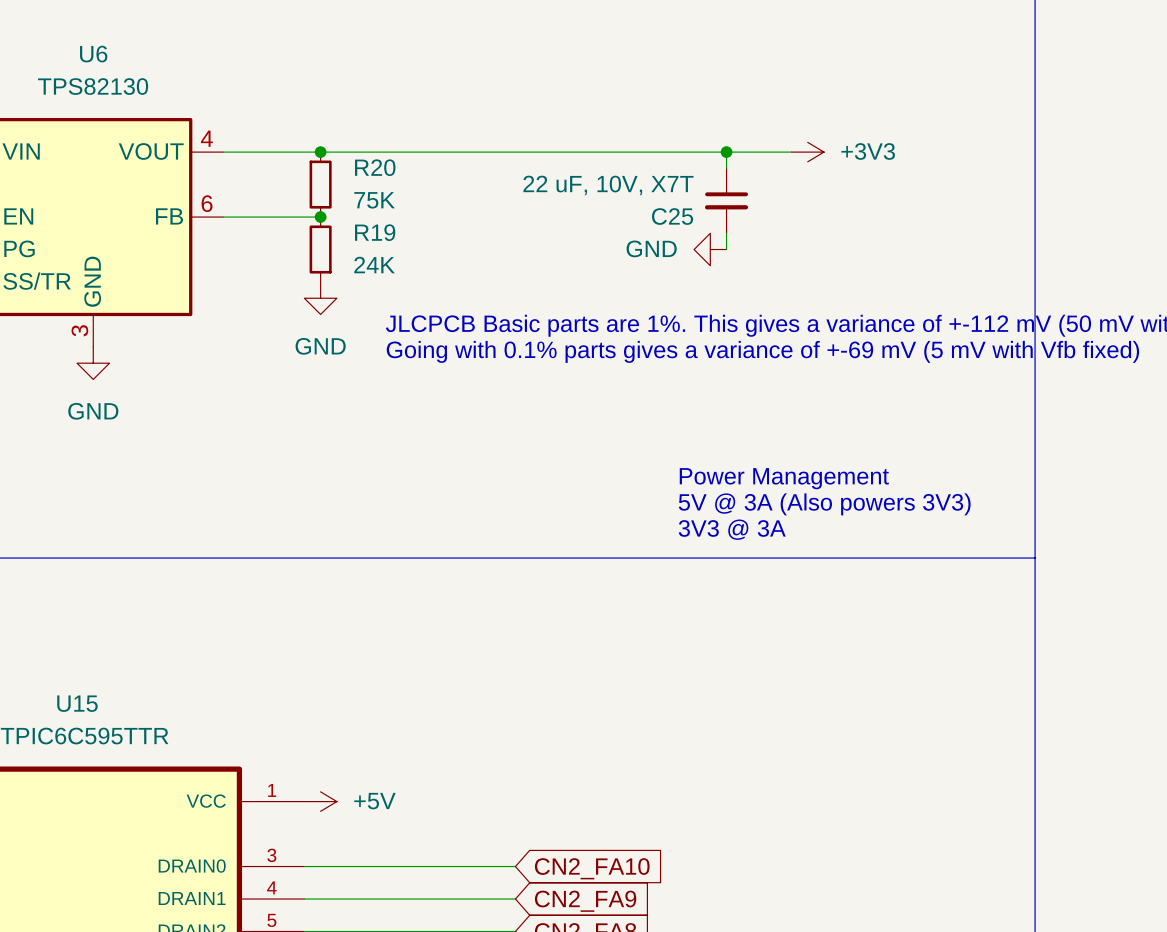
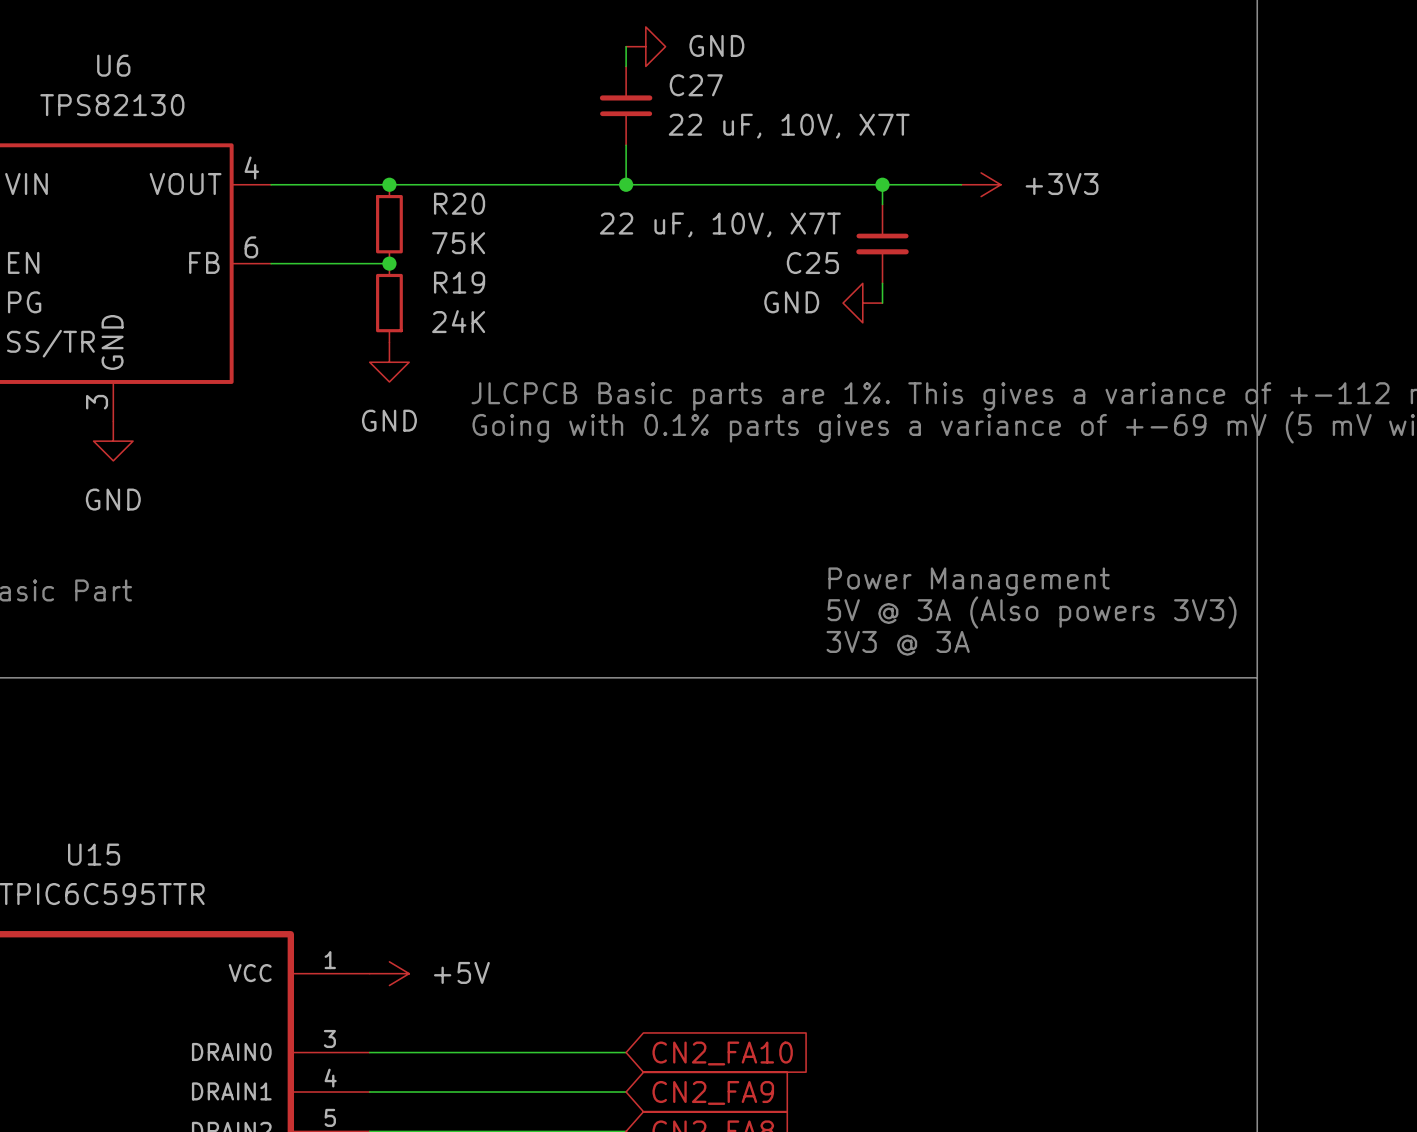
wire: none -> (626, 46) (626, 66)
power symbol: none -> GND (645, 46)
C27: none -> 22 uF, 10V, X7T (626, 105)
wire: none -> (626, 145) (626, 184)
junction: none -> (626, 184)

